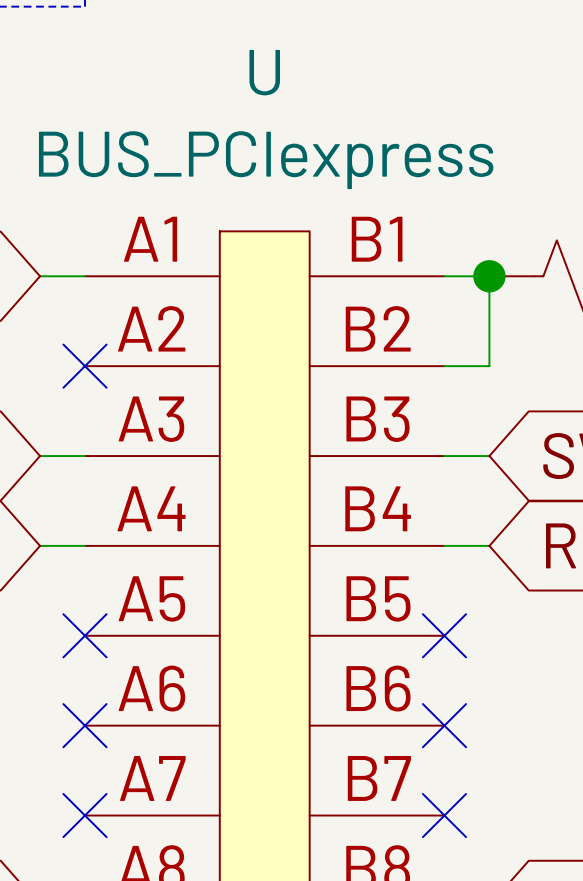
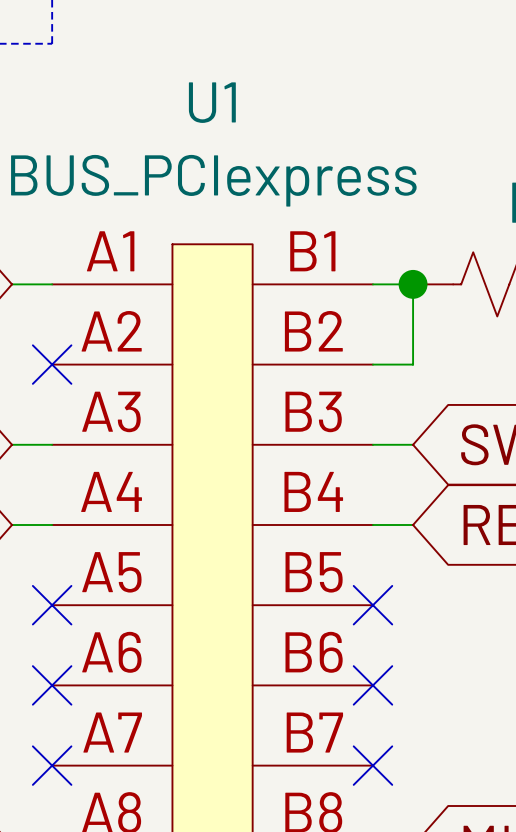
U name: U (264, 72) -> U1 (212, 102)

